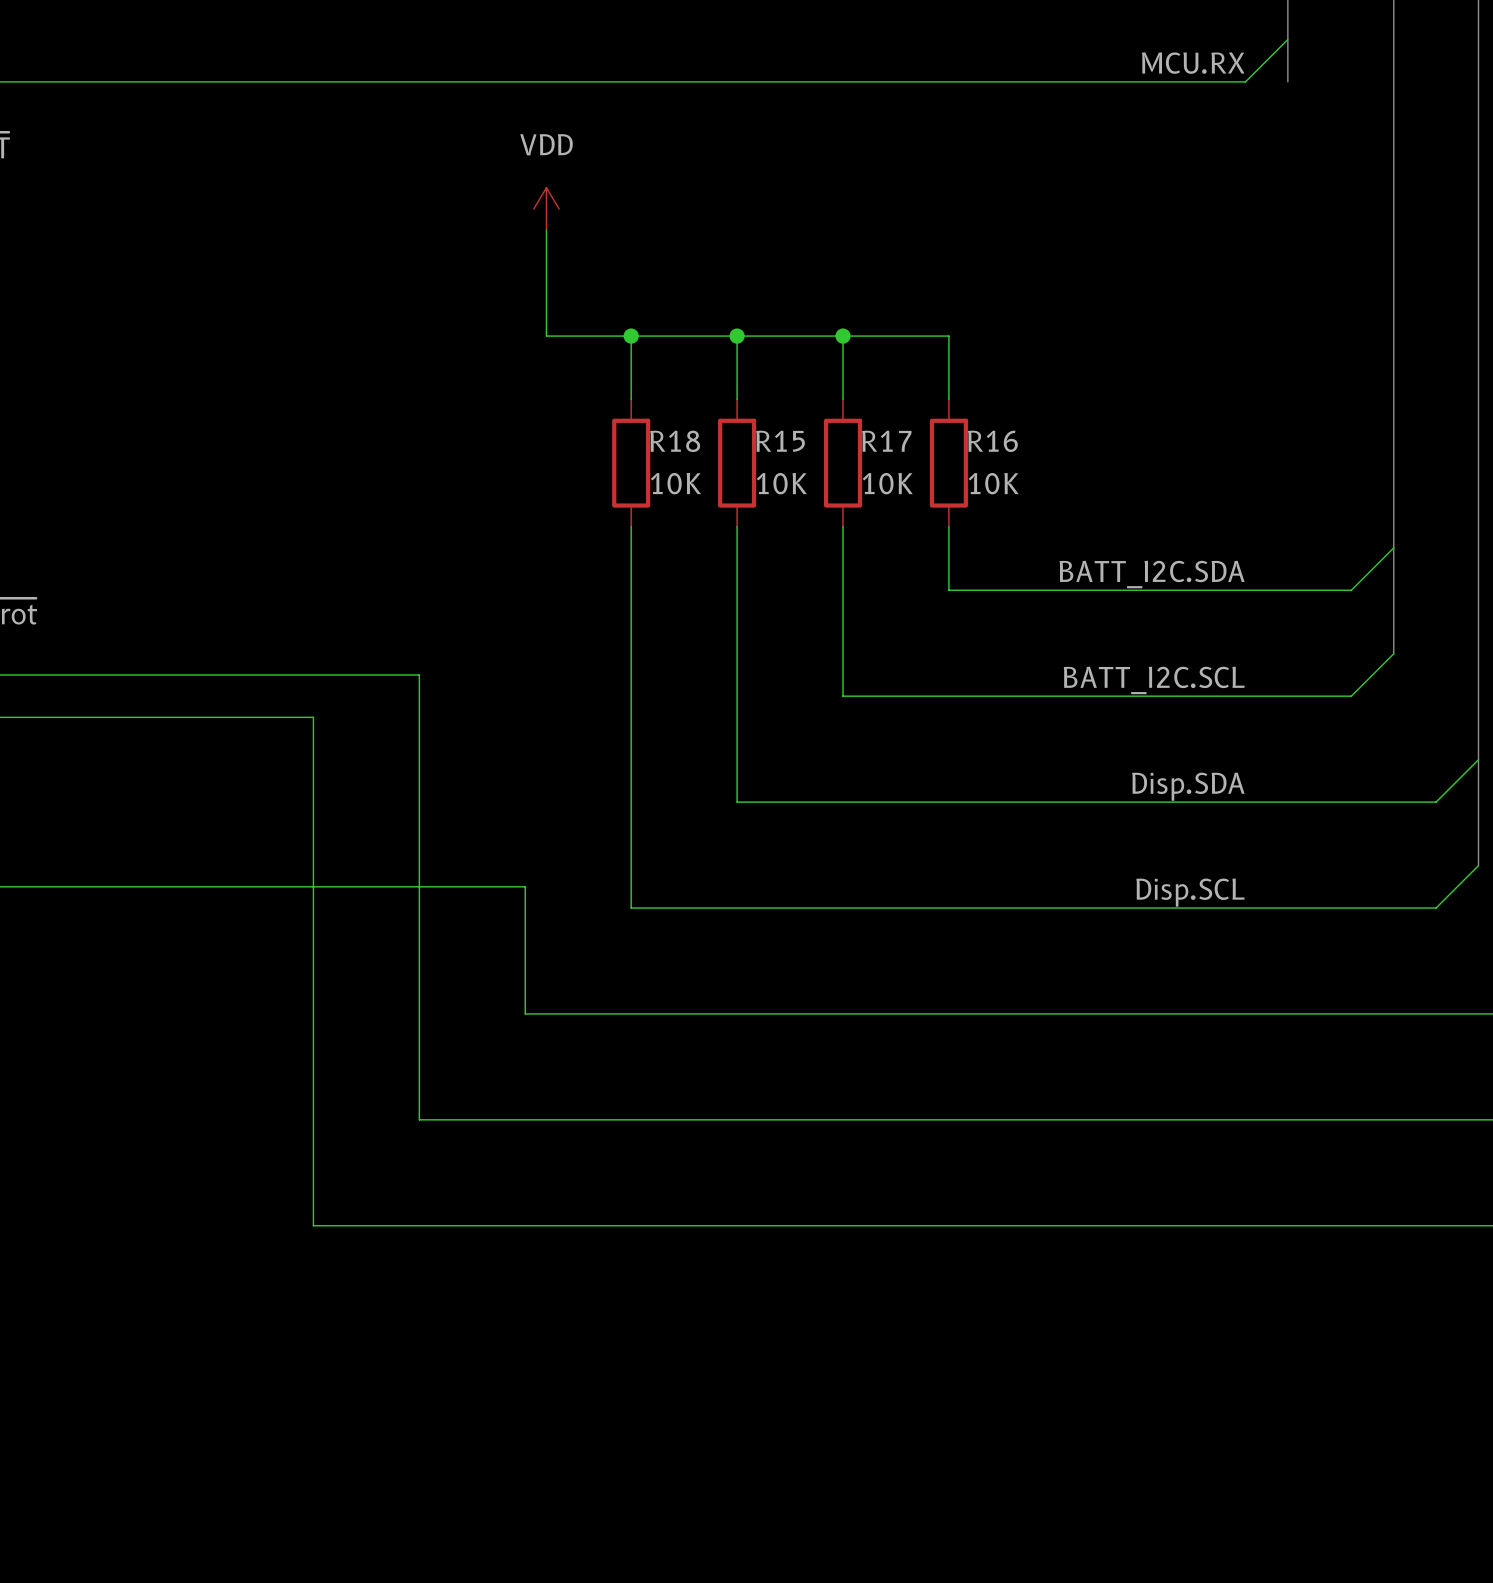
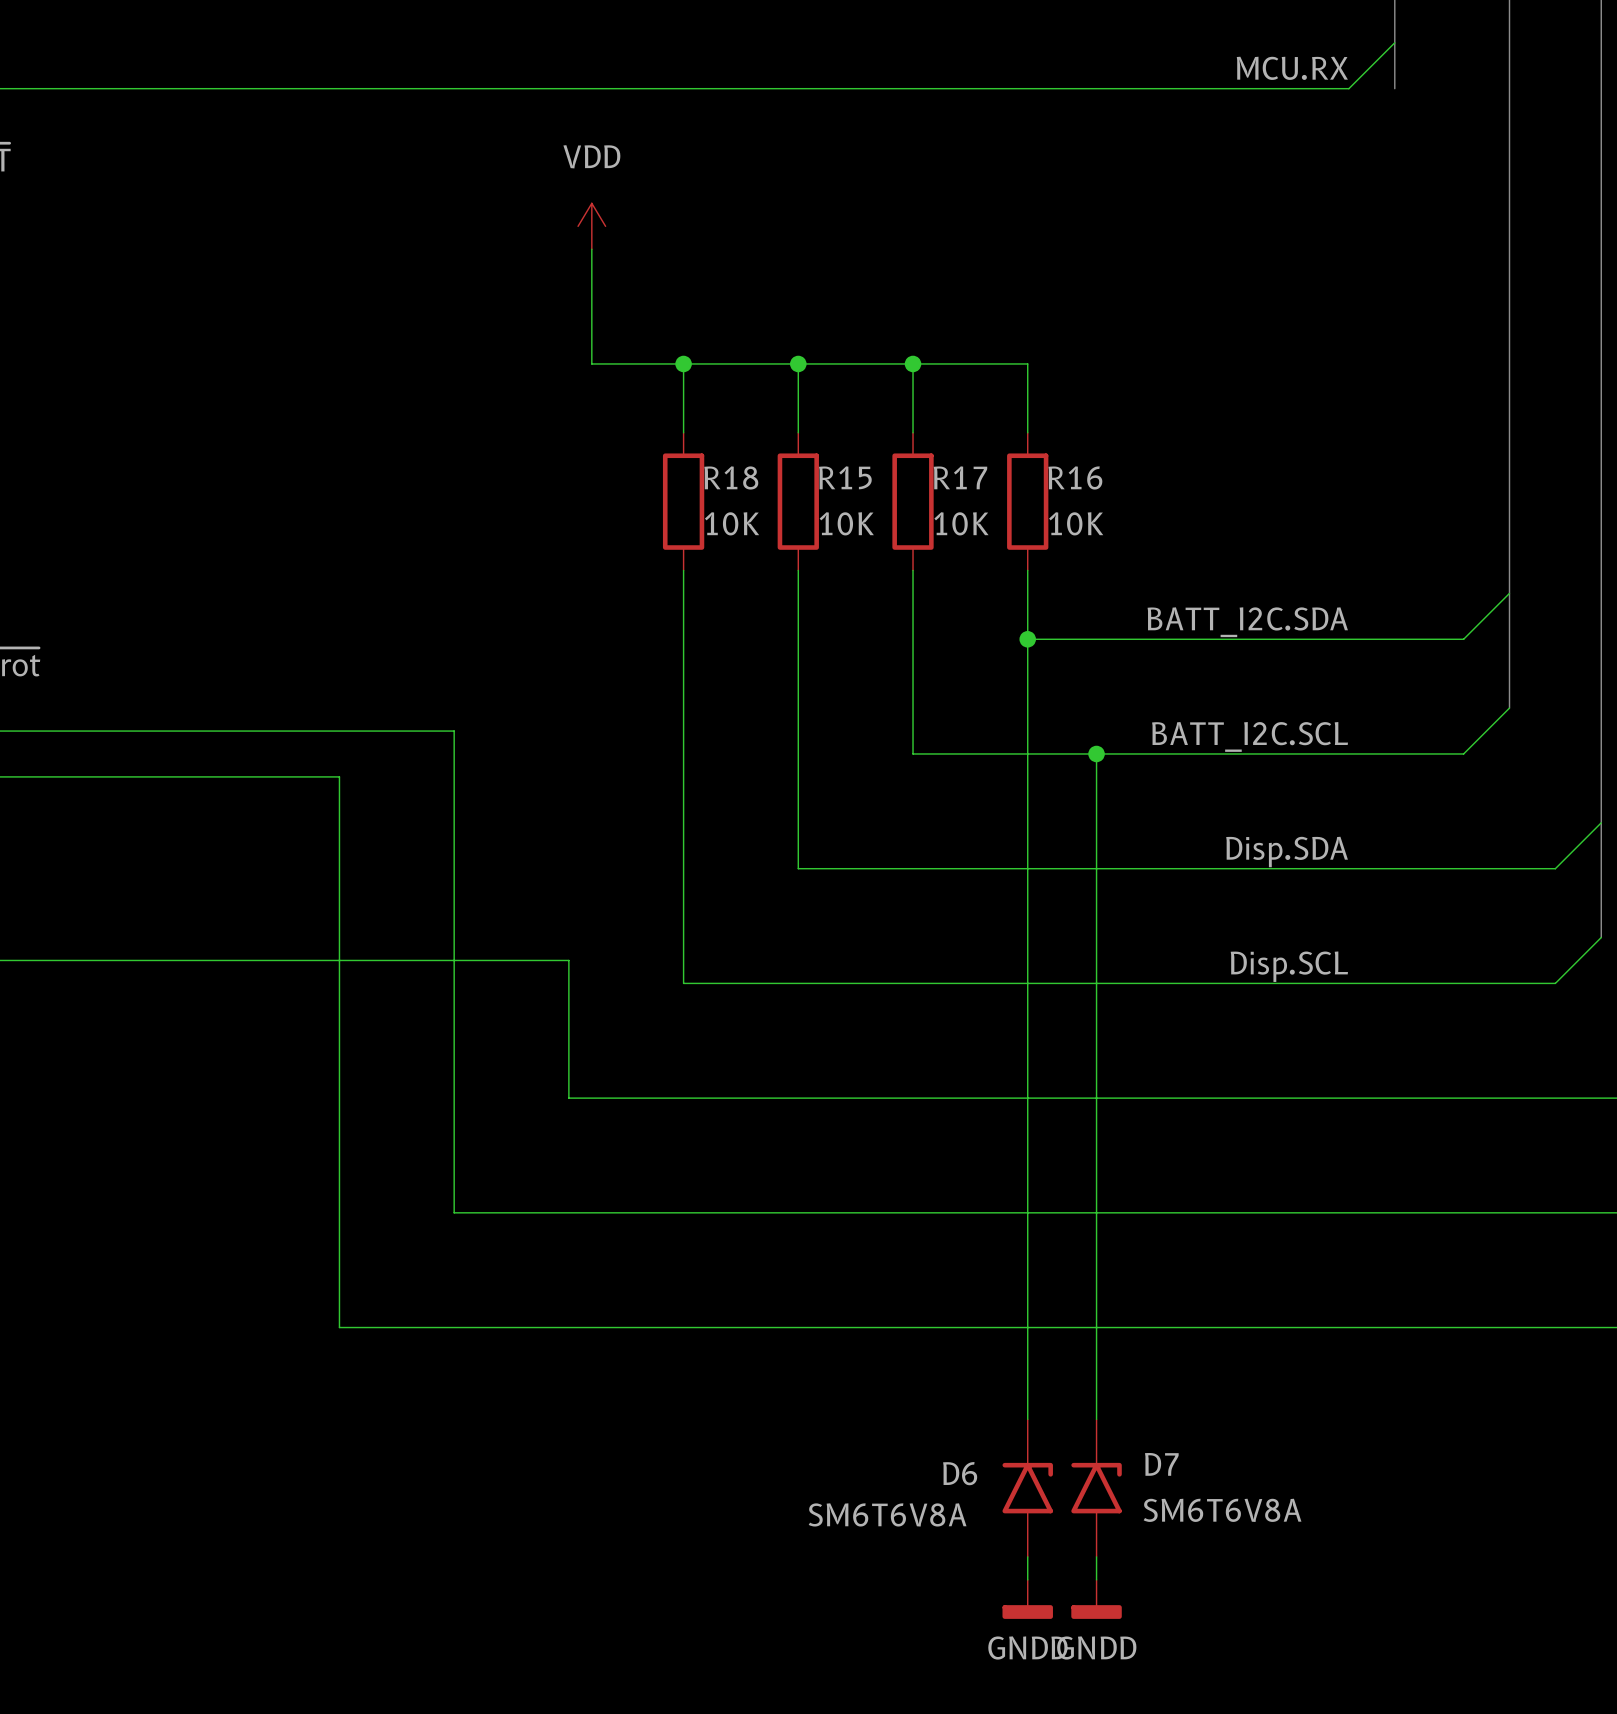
wire: none -> (1027, 639) (1027, 1419)
junction: none -> (1027, 639)
wire: none -> (1096, 753) (1096, 1419)
junction: none -> (1096, 753)
D6: none -> SM6T6V8A (1027, 1488)
D7: none -> SM6T6V8A (1096, 1488)
wire: none -> (1027, 1556) (1027, 1579)
wire: none -> (1096, 1556) (1096, 1579)
power symbol: none -> GNDD (1027, 1599)
power symbol: none -> GNDD (1096, 1599)

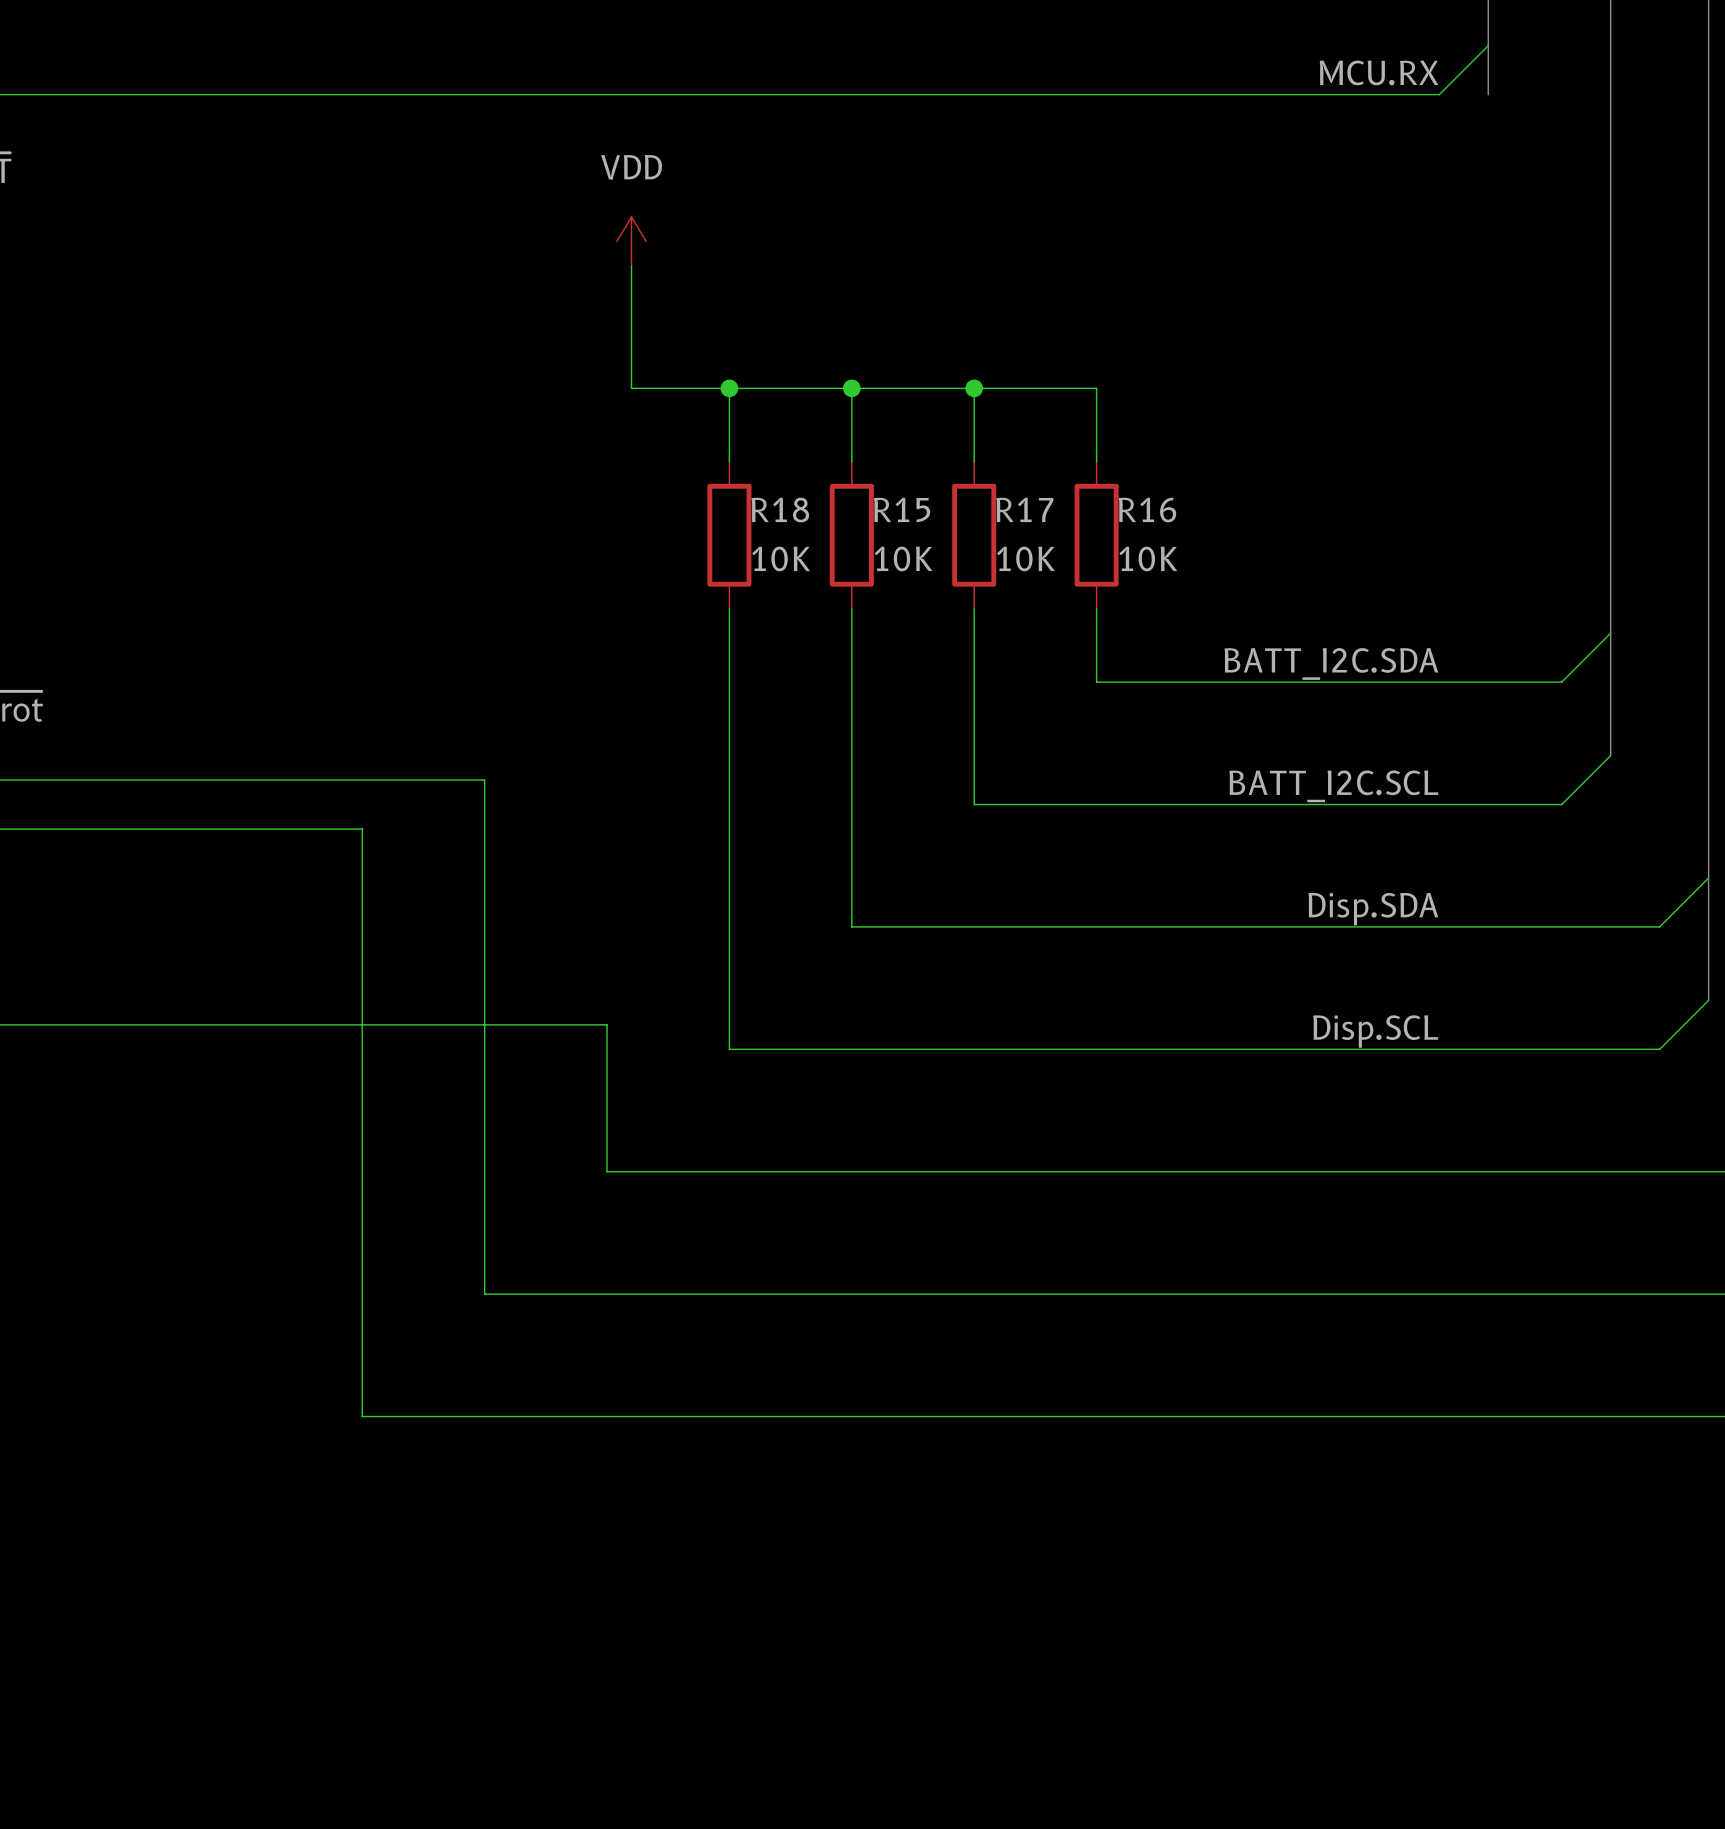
wire: (1027, 639) (1027, 1419) -> none
junction: (1027, 639) -> none
wire: (1096, 753) (1096, 1419) -> none
junction: (1096, 753) -> none
D6: SM6T6V8A (1027, 1488) -> none
D7: SM6T6V8A (1096, 1488) -> none
wire: (1027, 1556) (1027, 1579) -> none
wire: (1096, 1556) (1096, 1579) -> none
power symbol: GNDD (1027, 1599) -> none
power symbol: GNDD (1096, 1599) -> none

